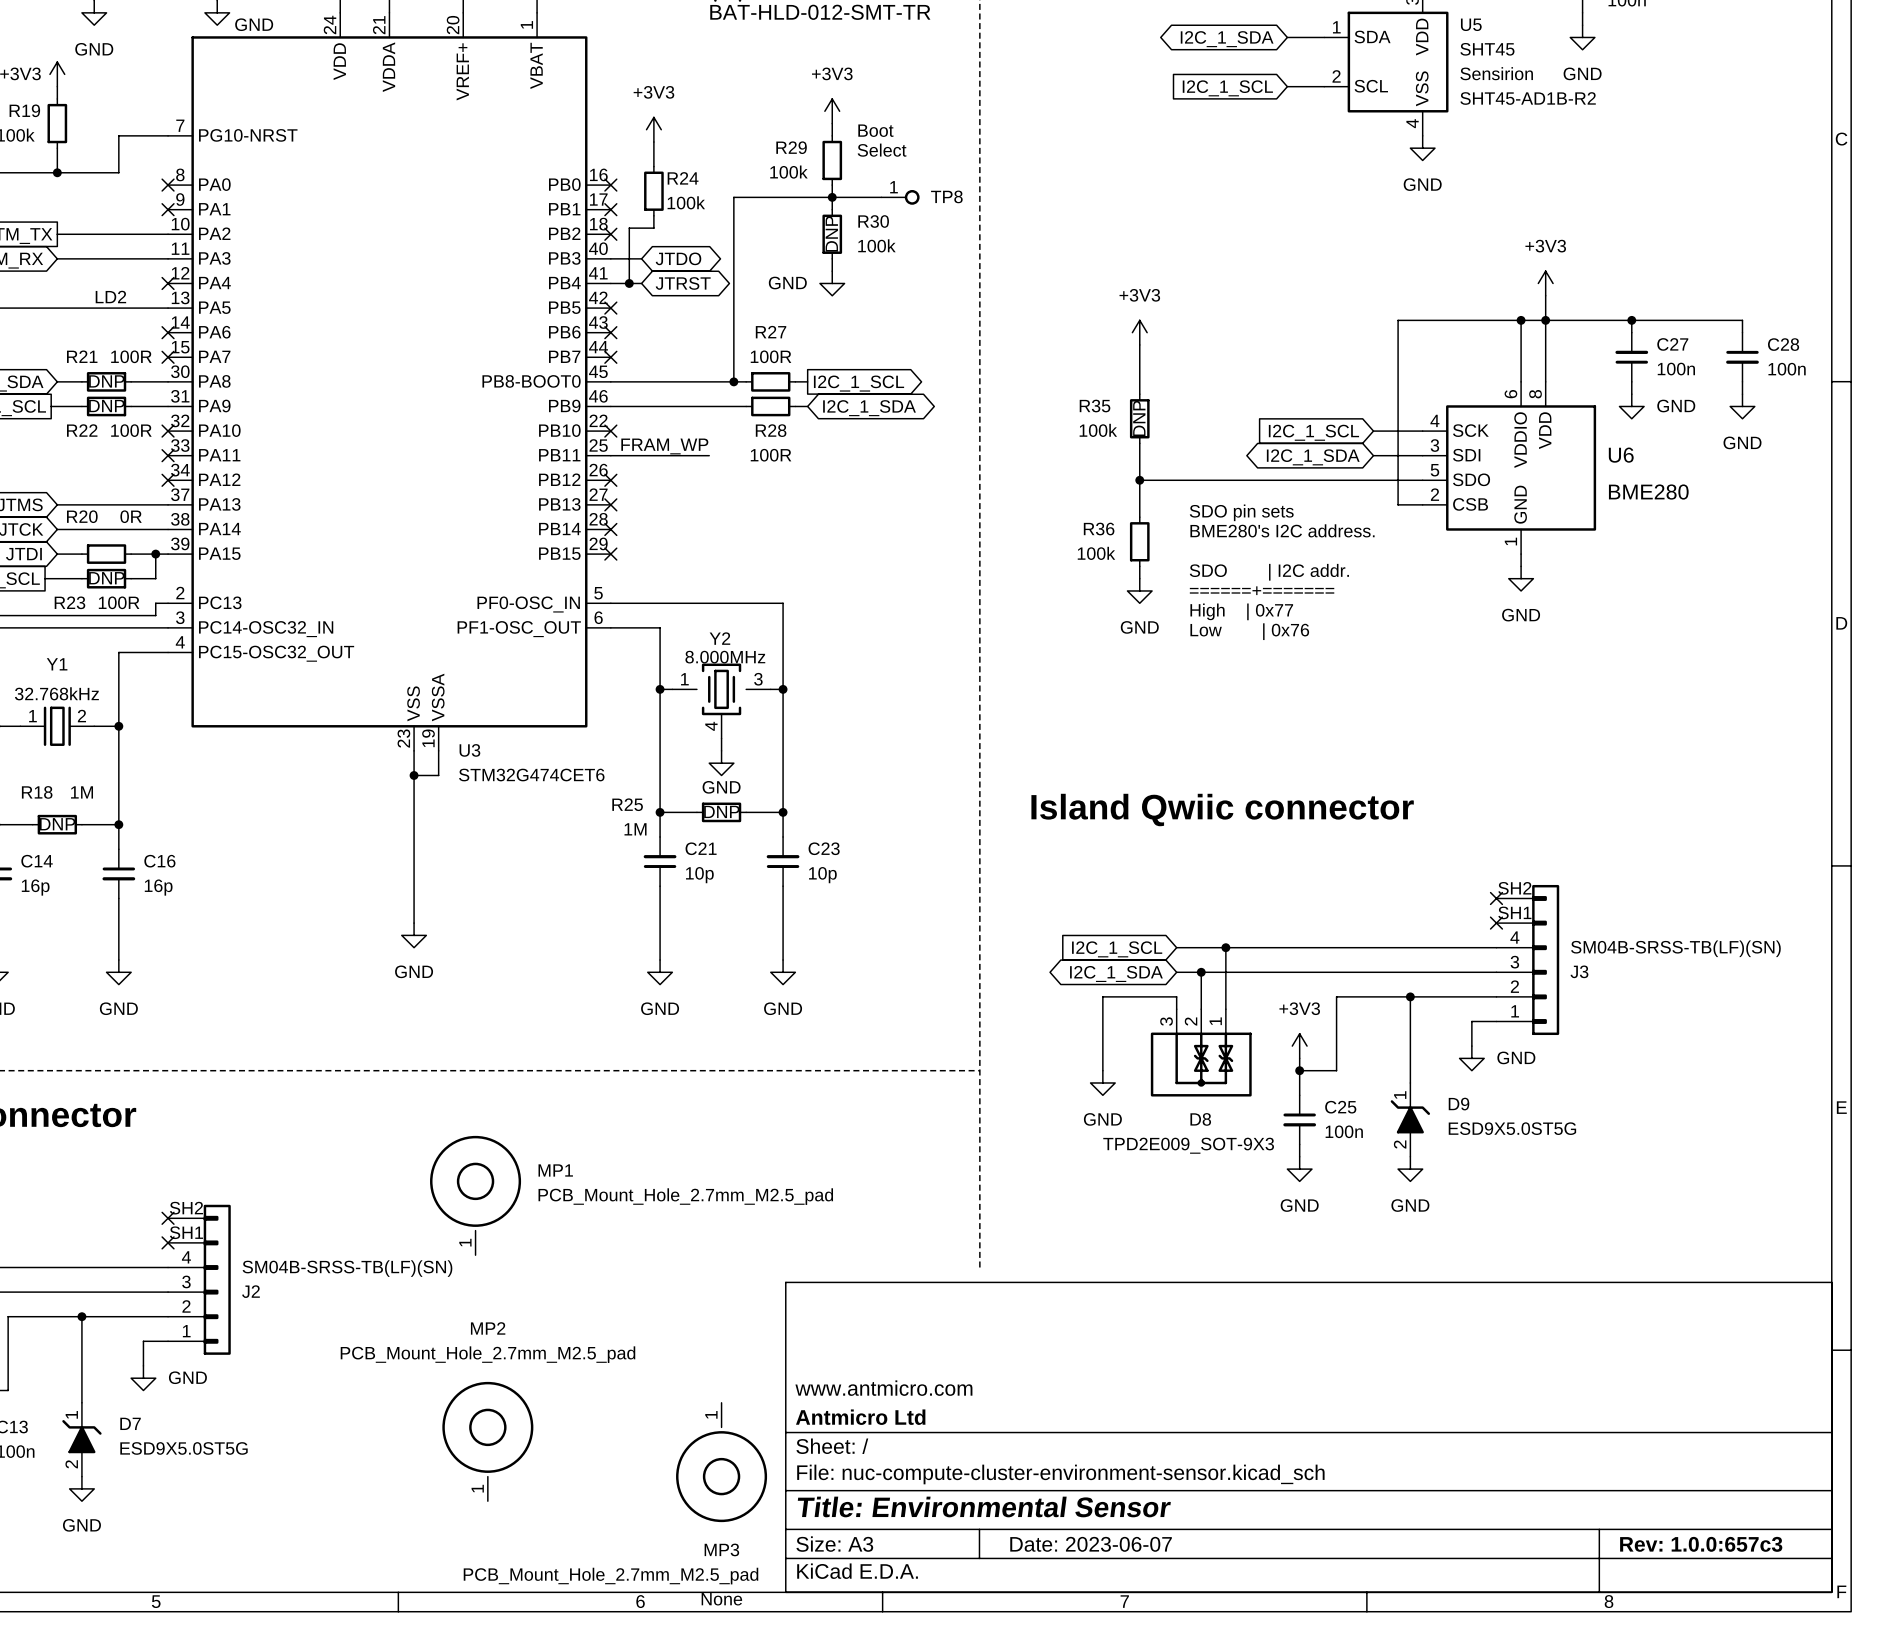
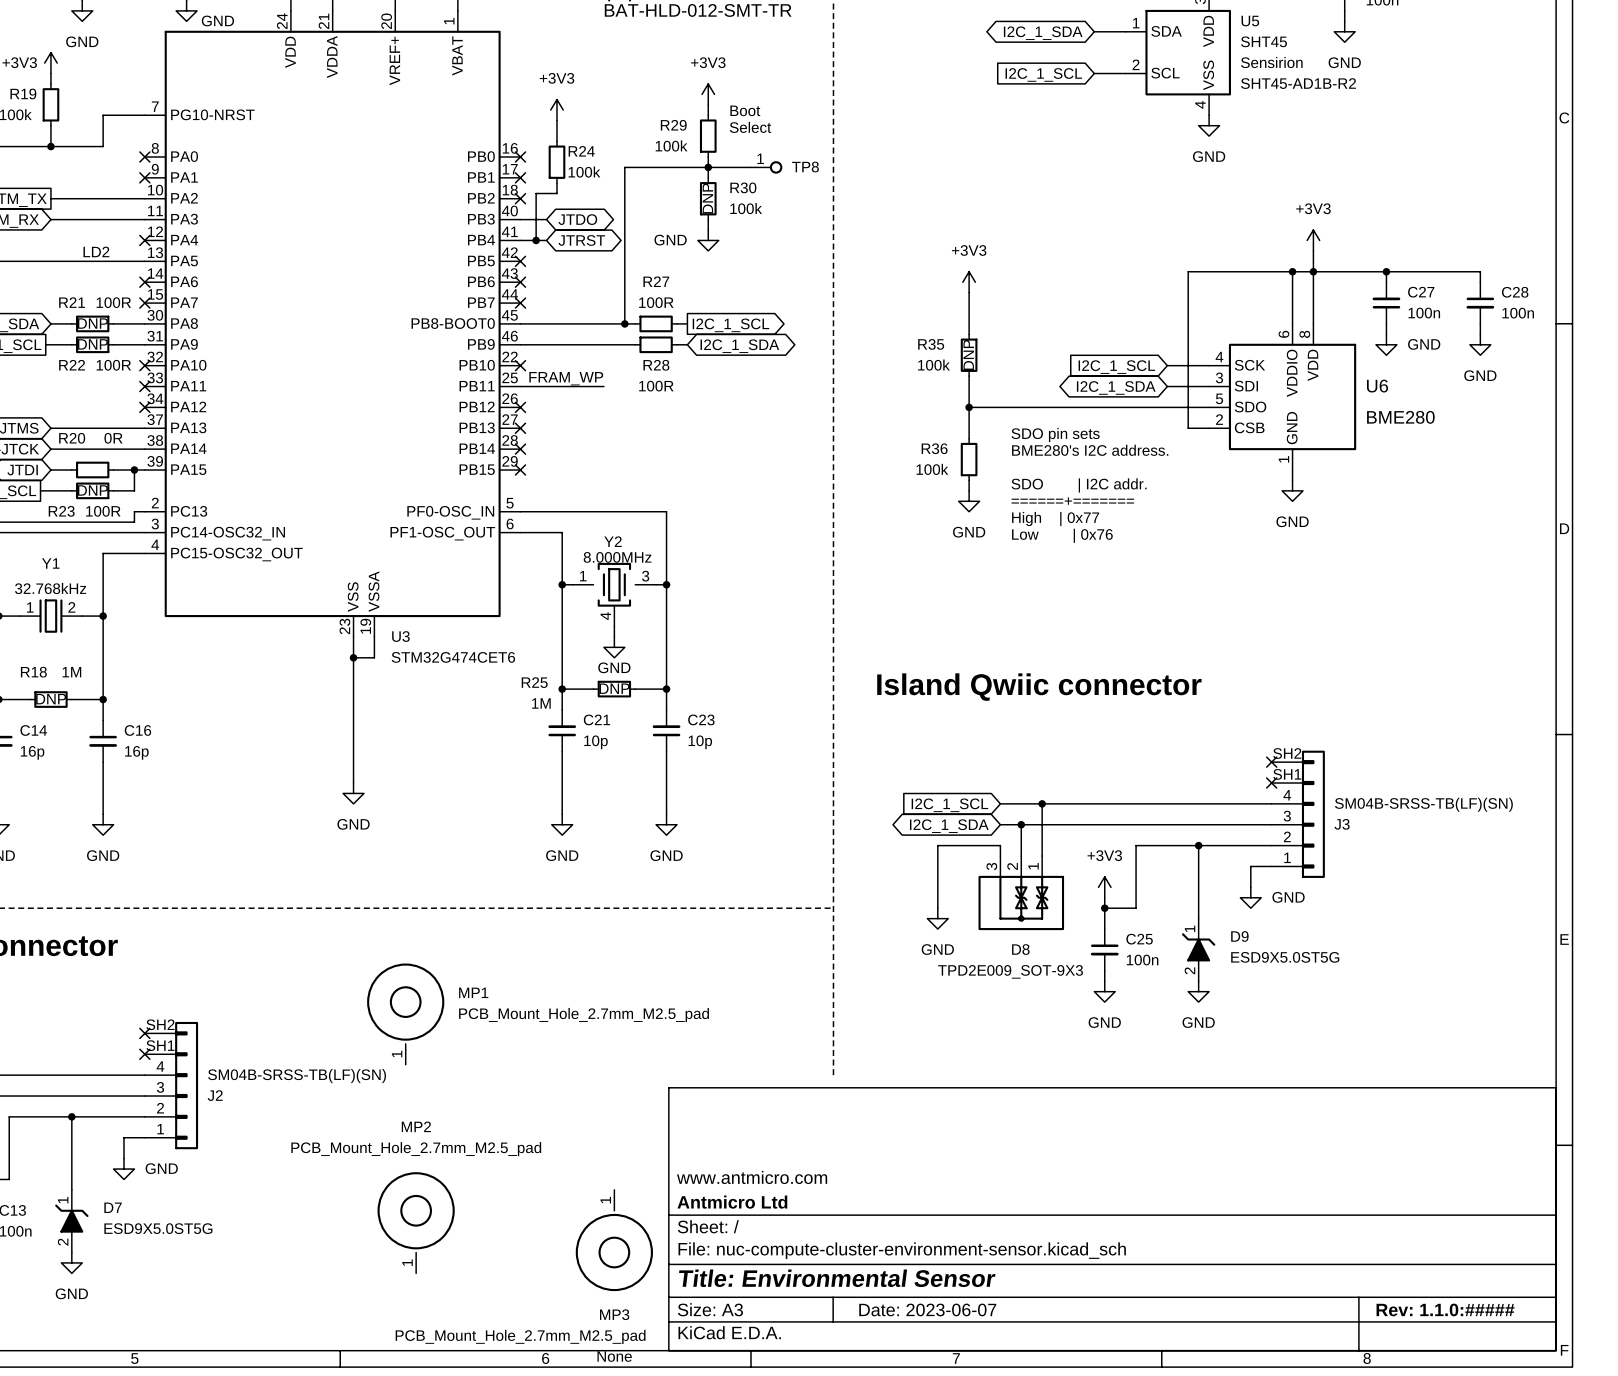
title block: Rev: 1.0.0:657c3 (1701, 1544) -> Rev: 1.1.0:##### (1445, 1309)

